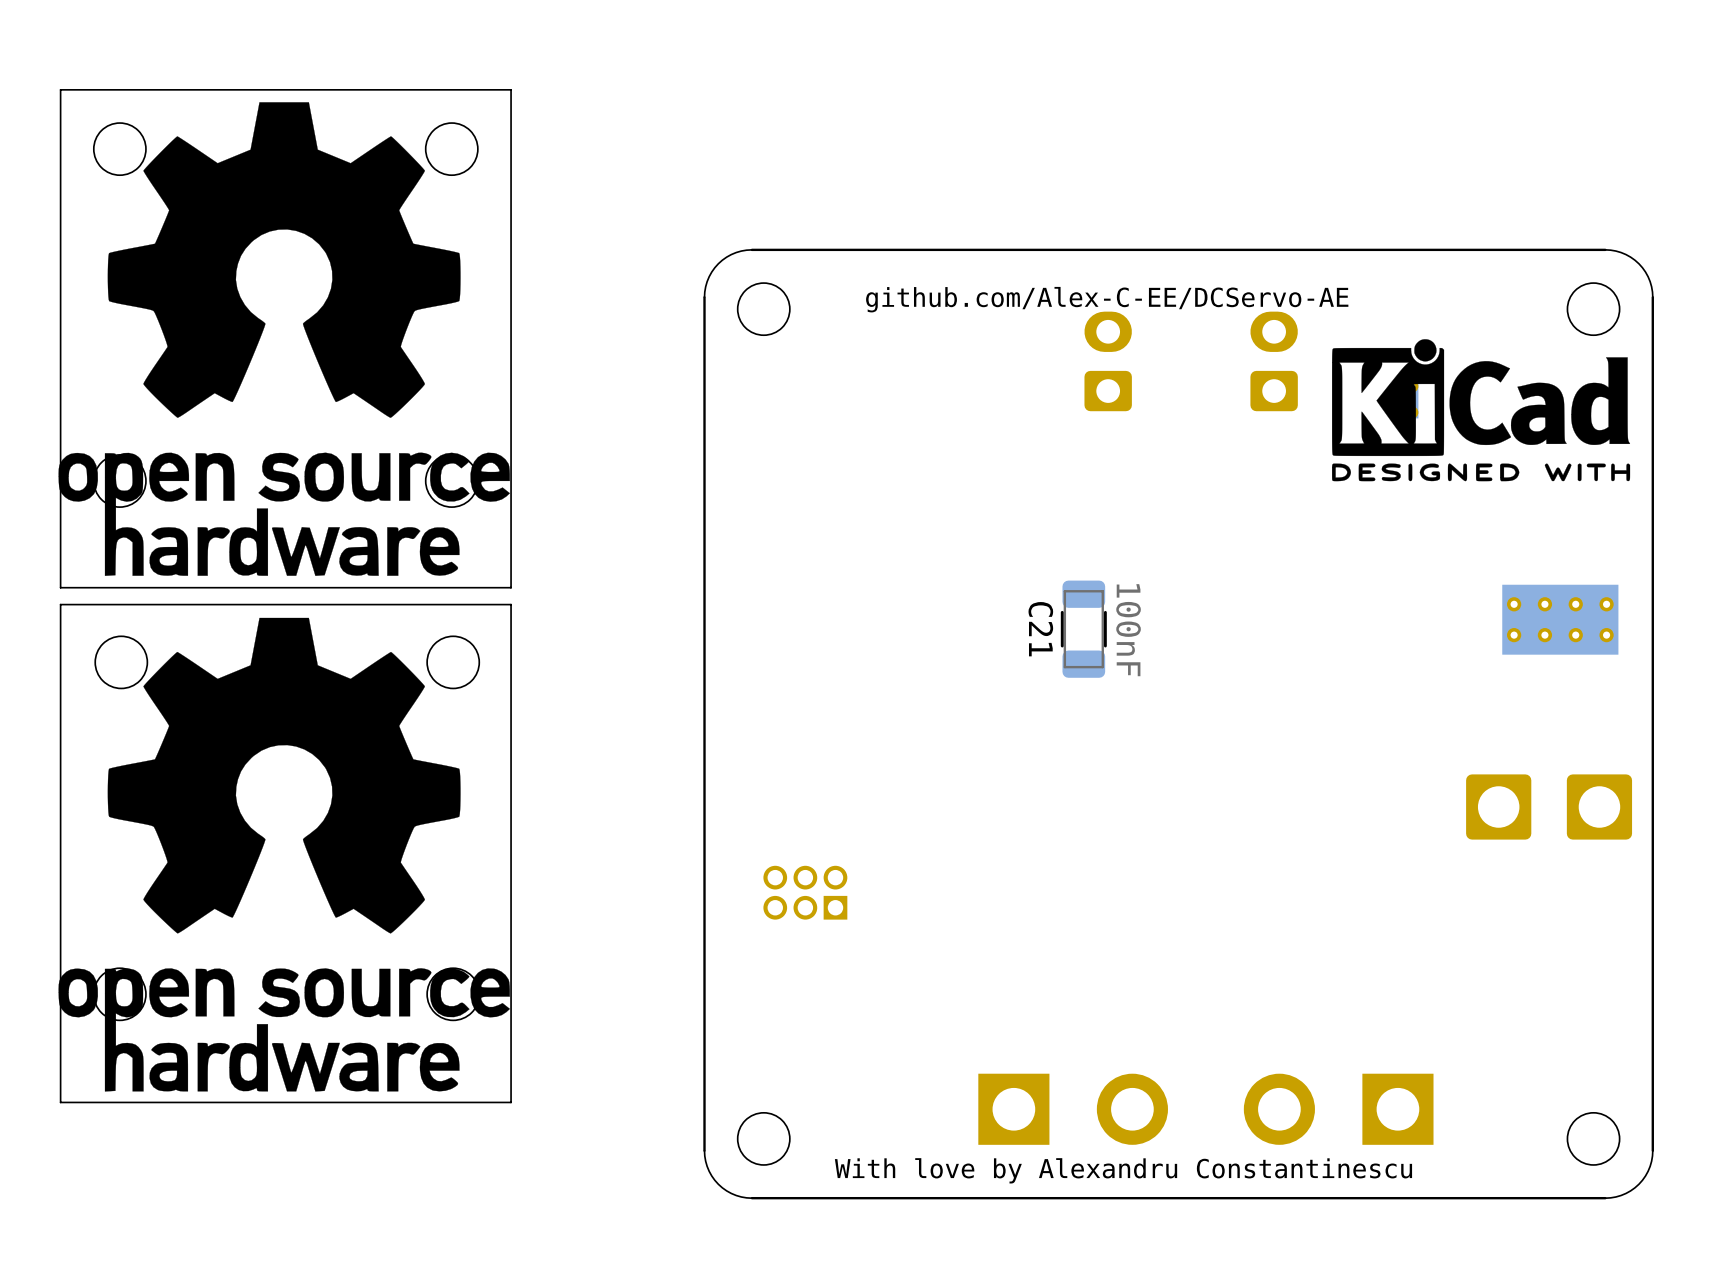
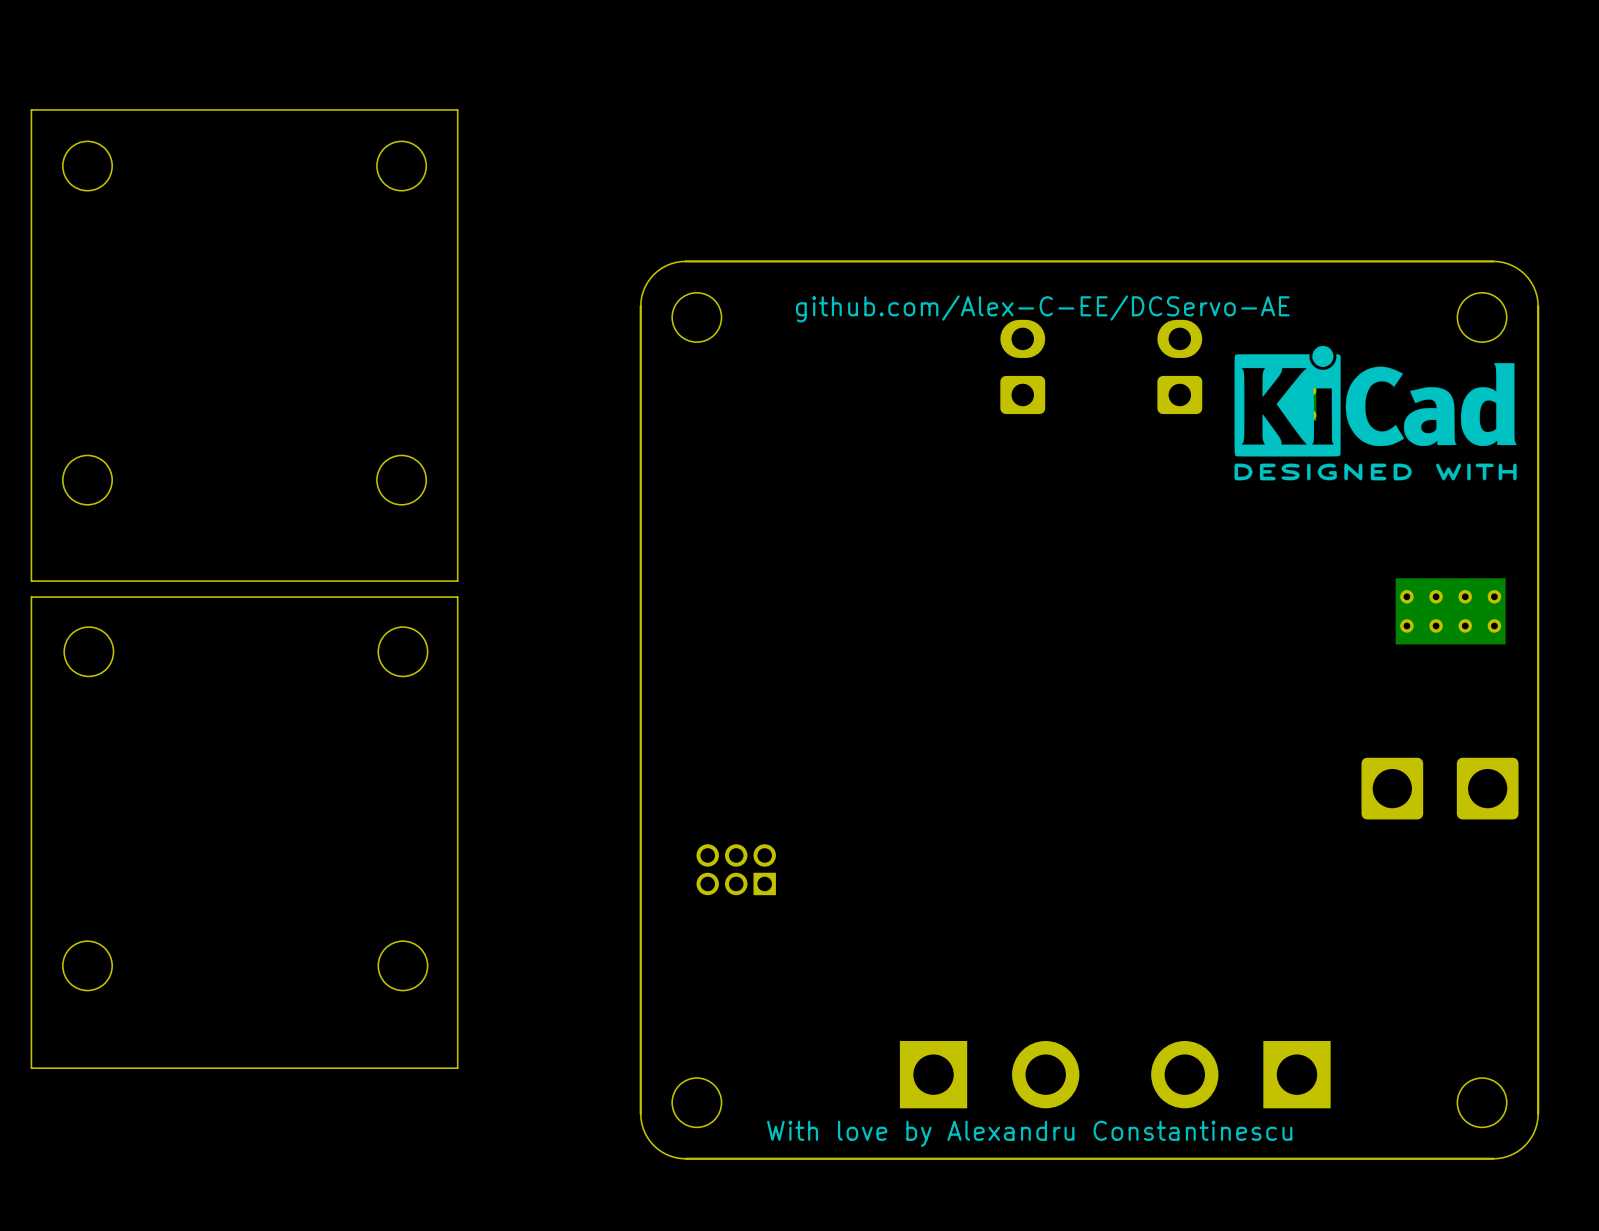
drawing: [58, 102, 510, 576] -> none
drawing: [58, 617, 510, 1092] -> none
C21: 100nF (1083, 629) -> none

